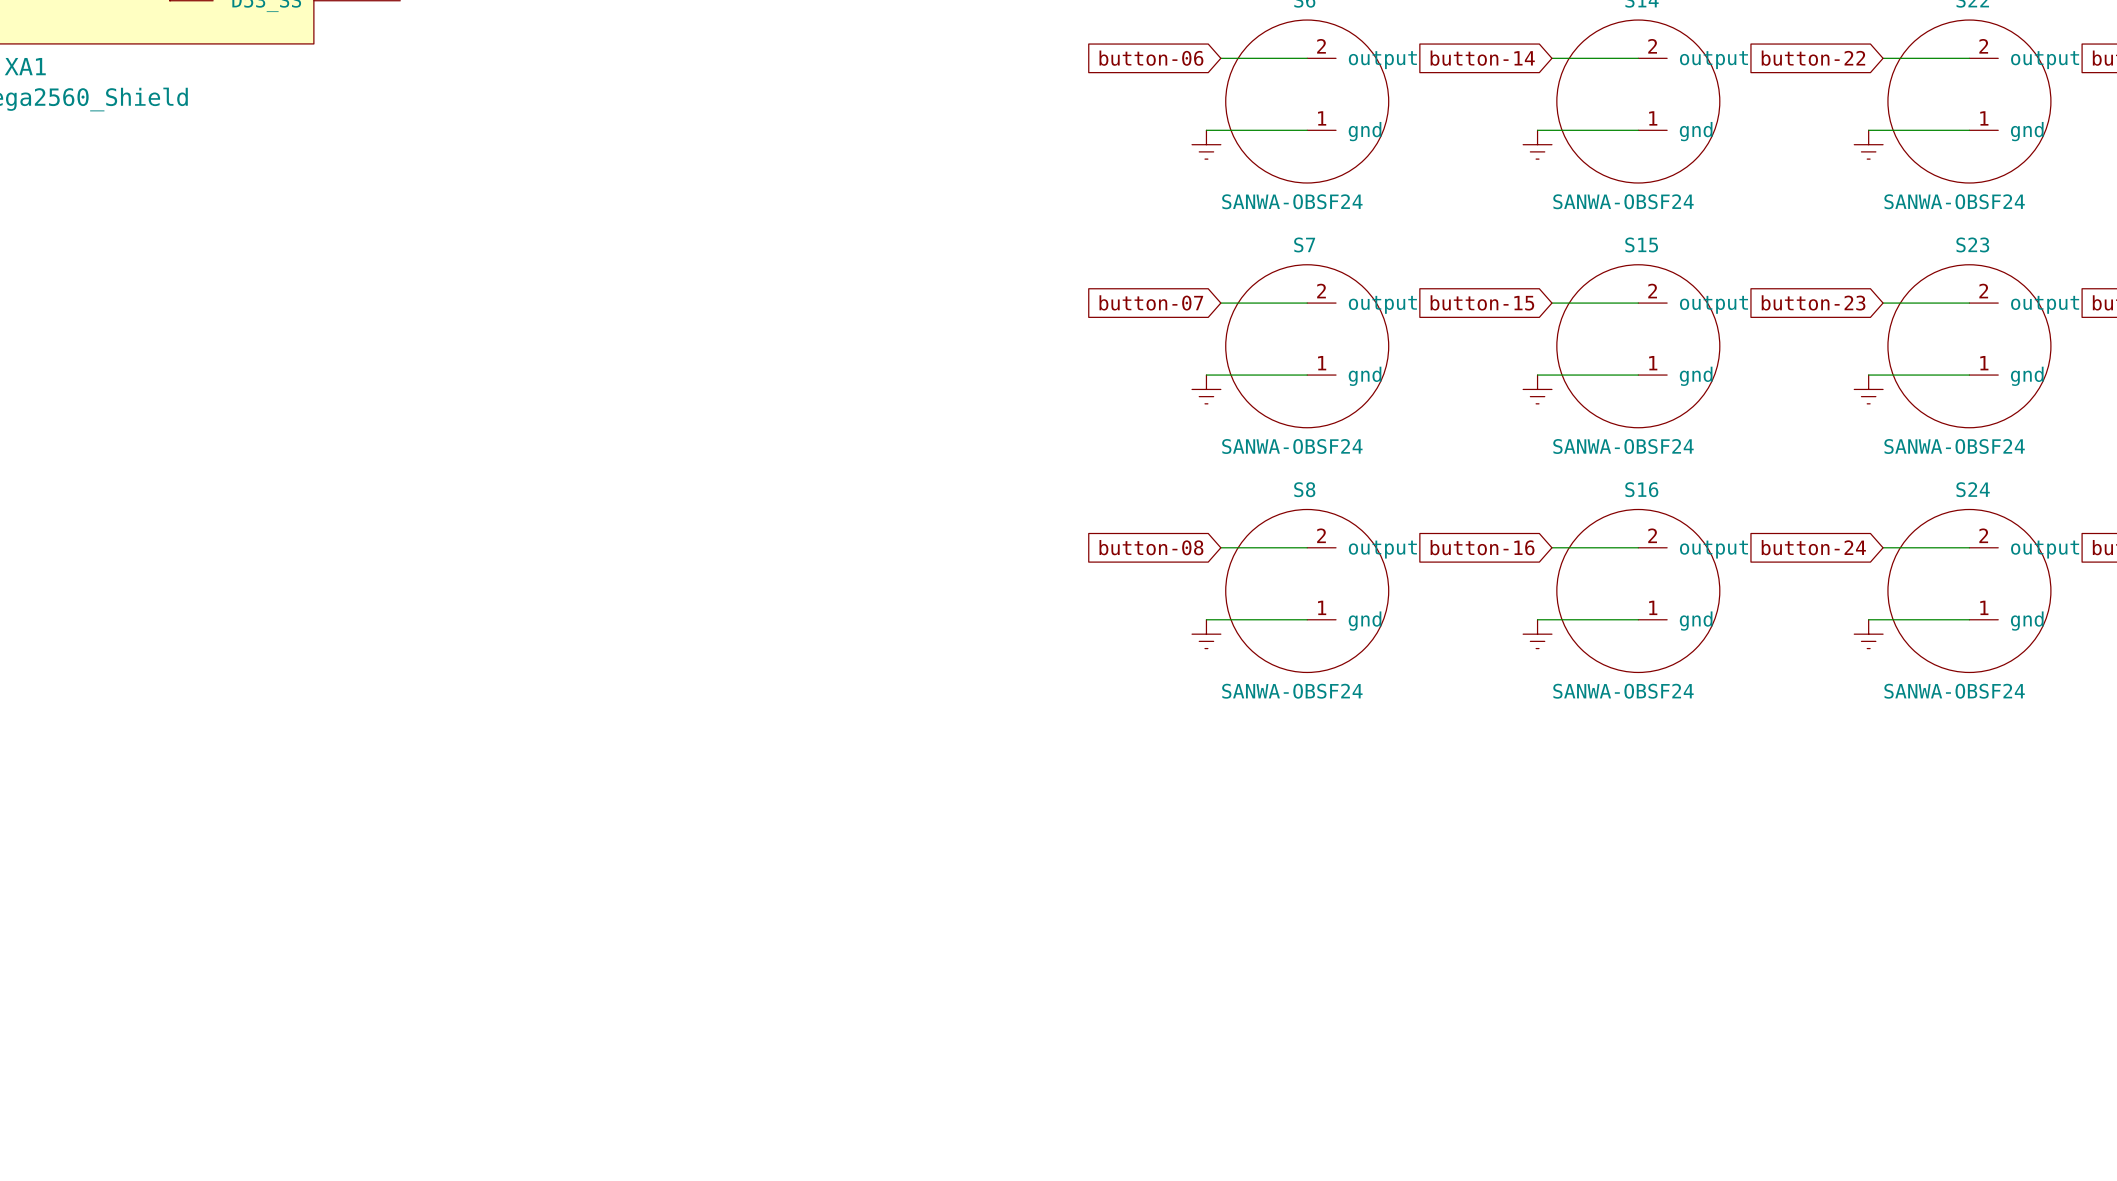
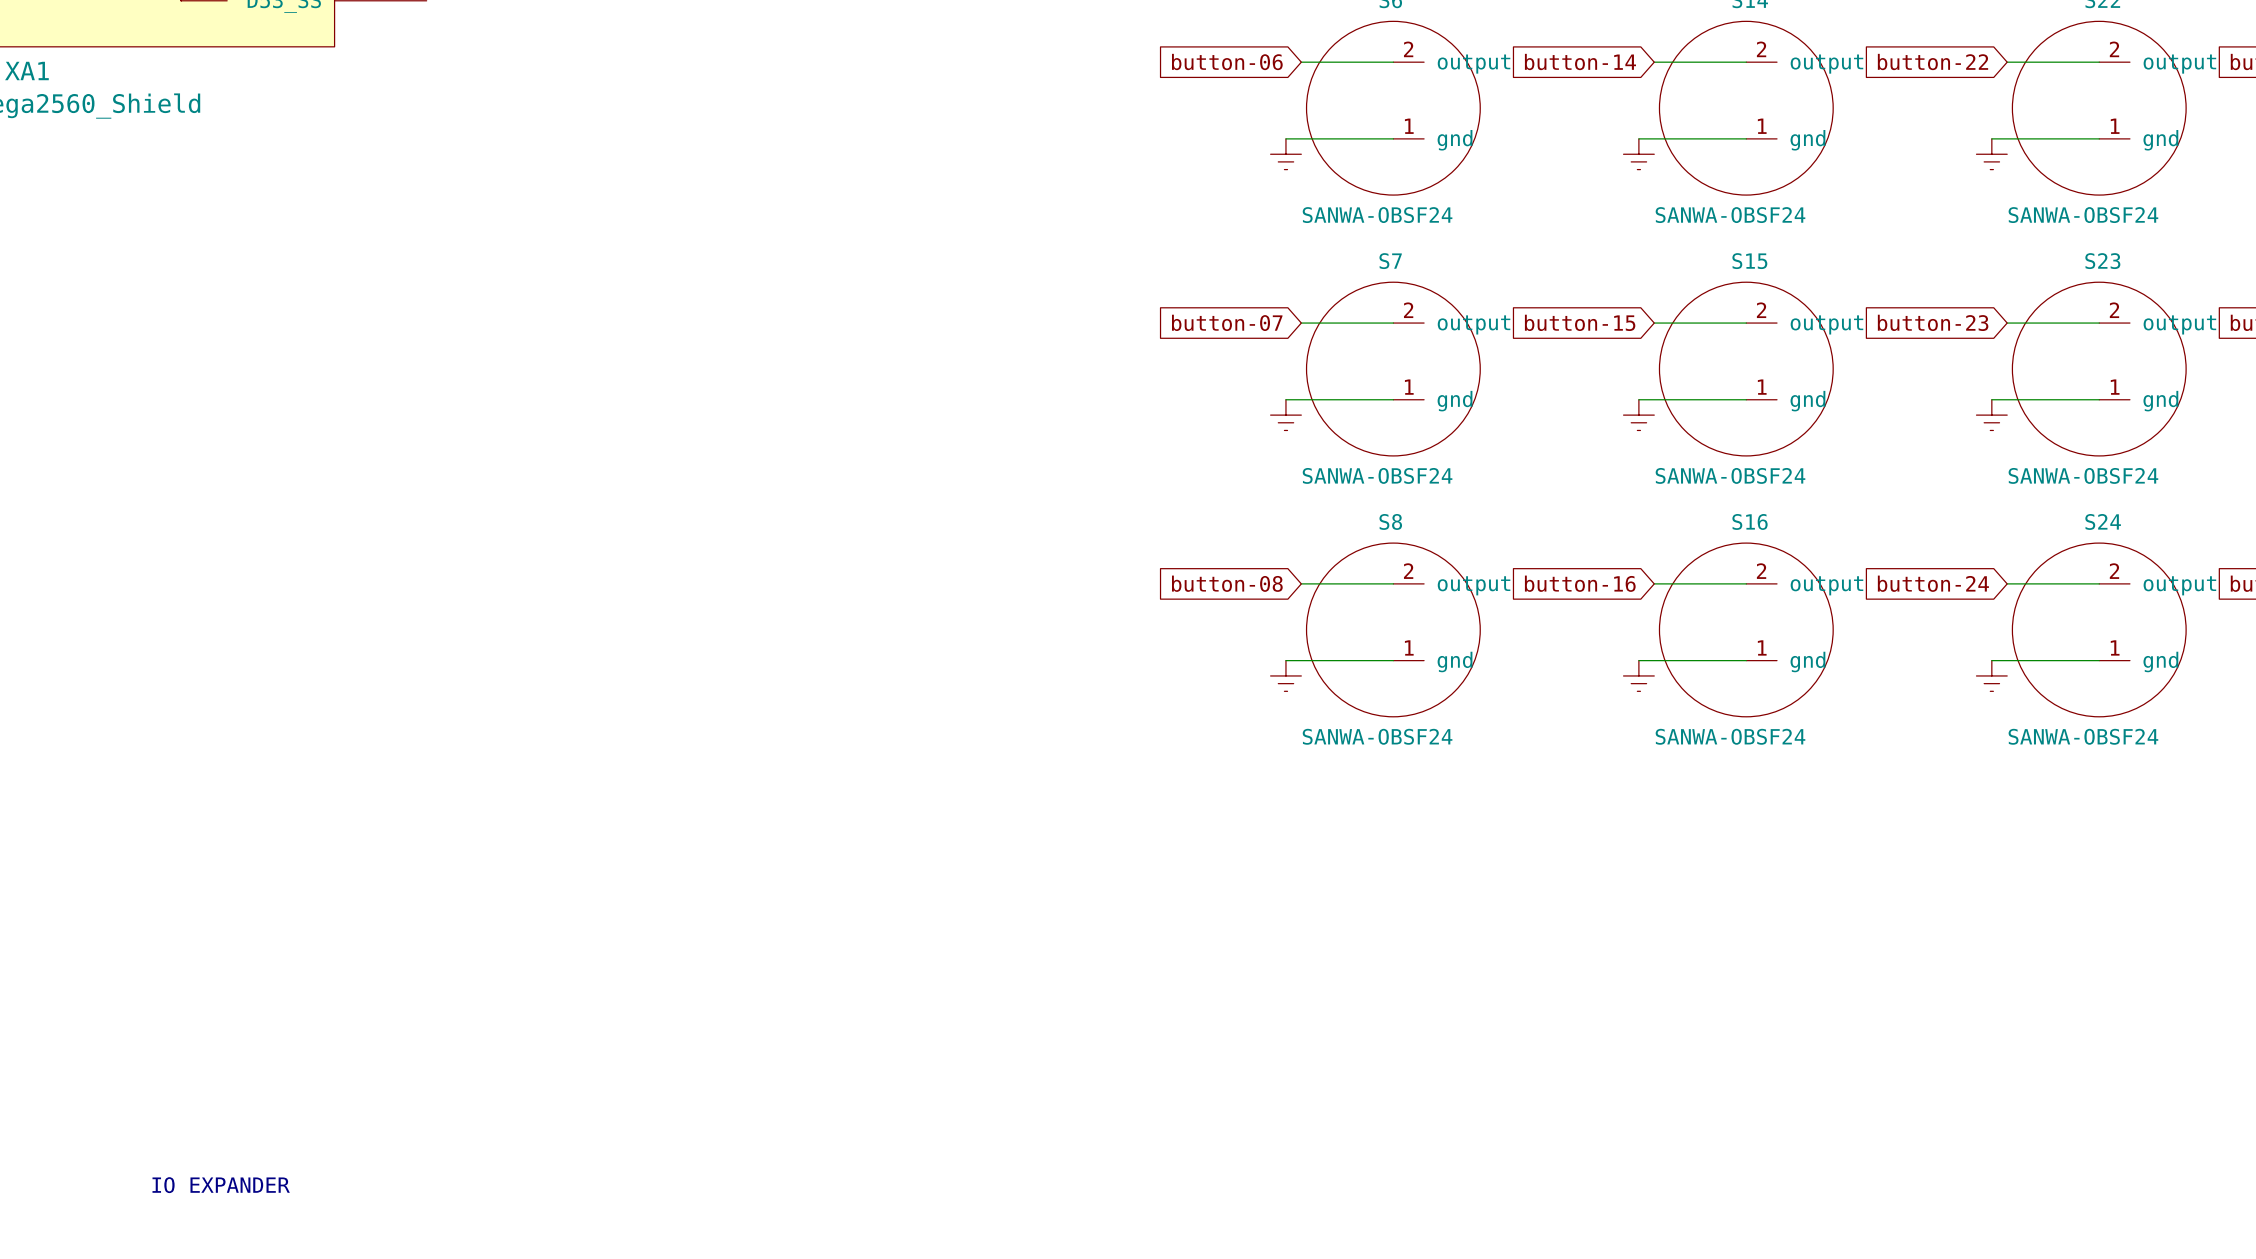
text: none -> IO EXPANDER (221, 1185)

